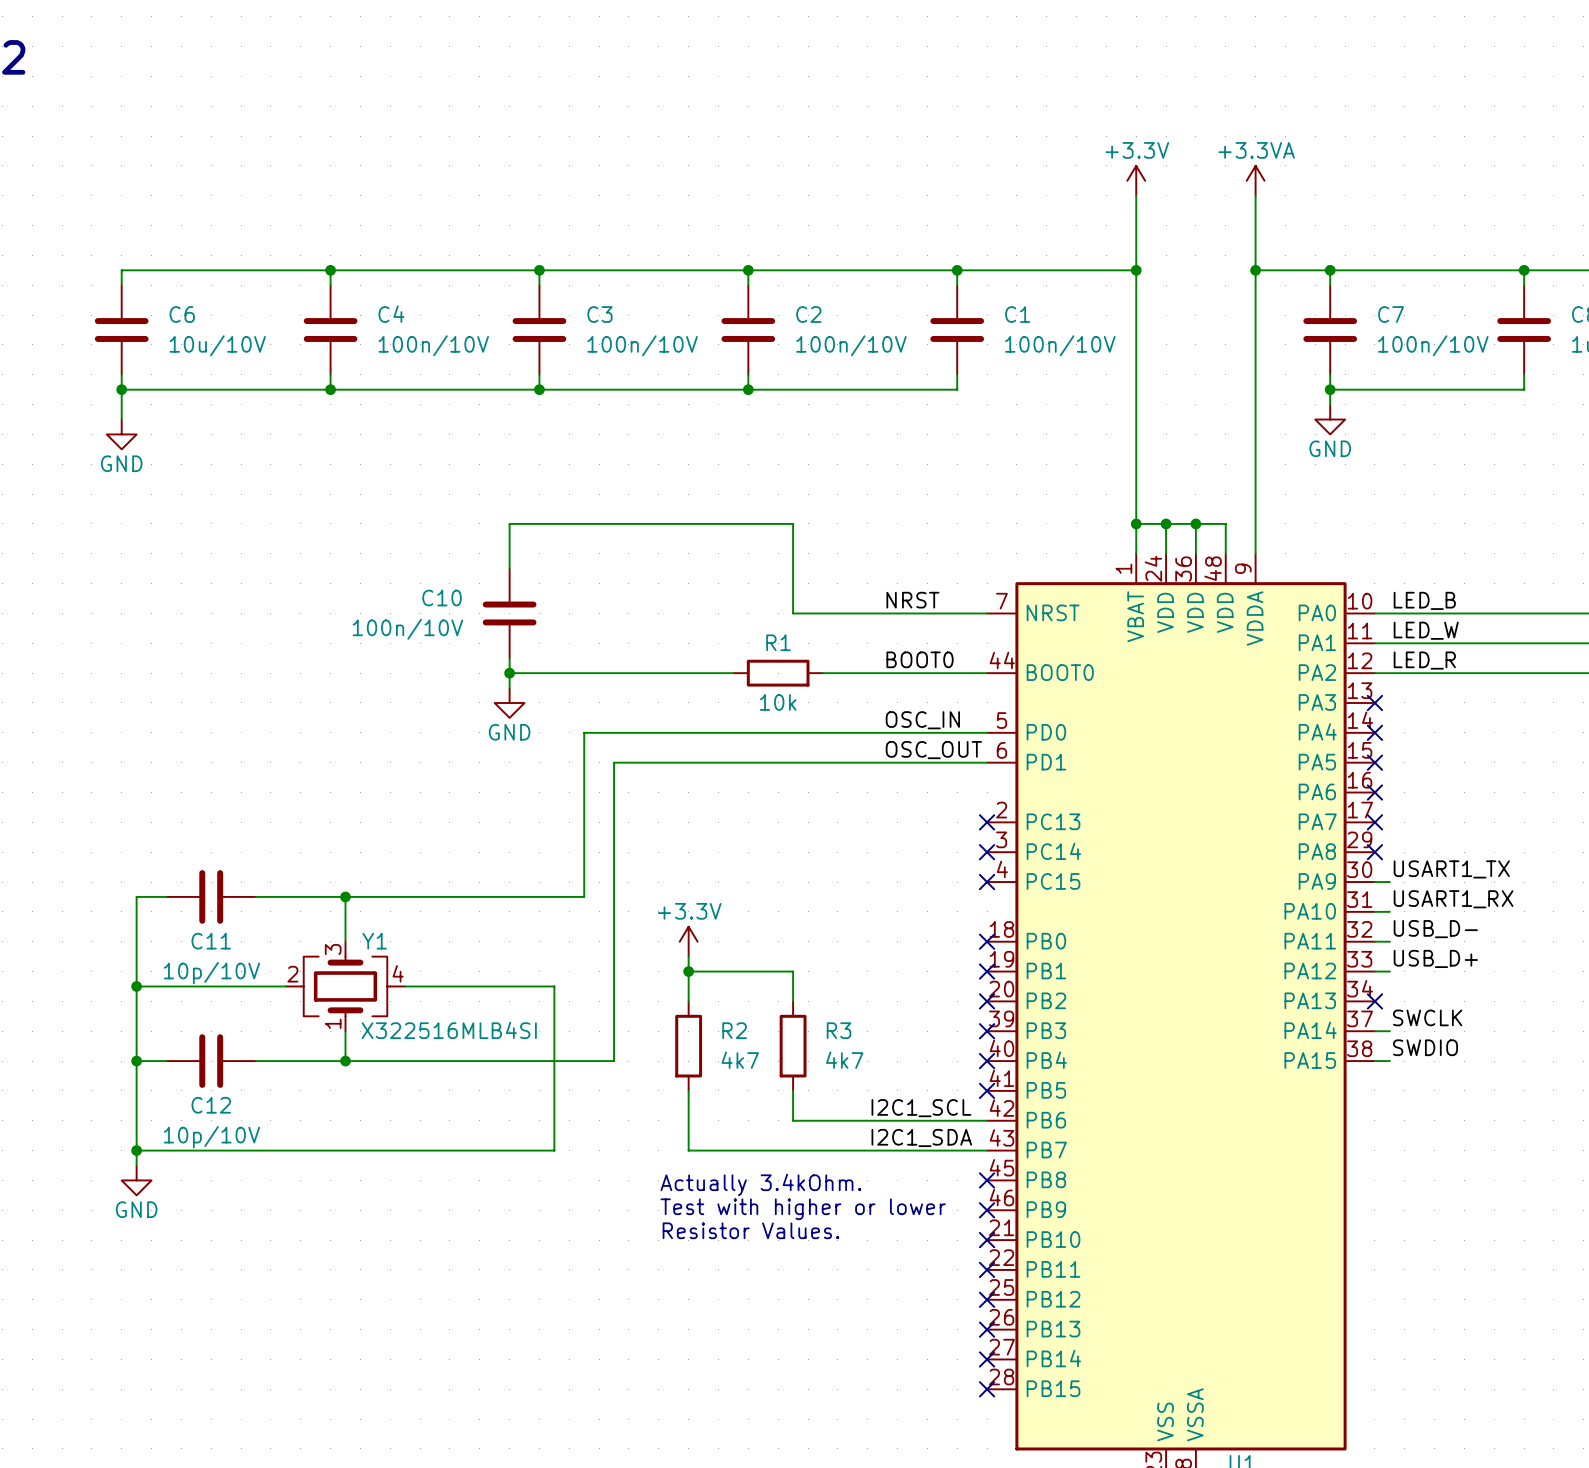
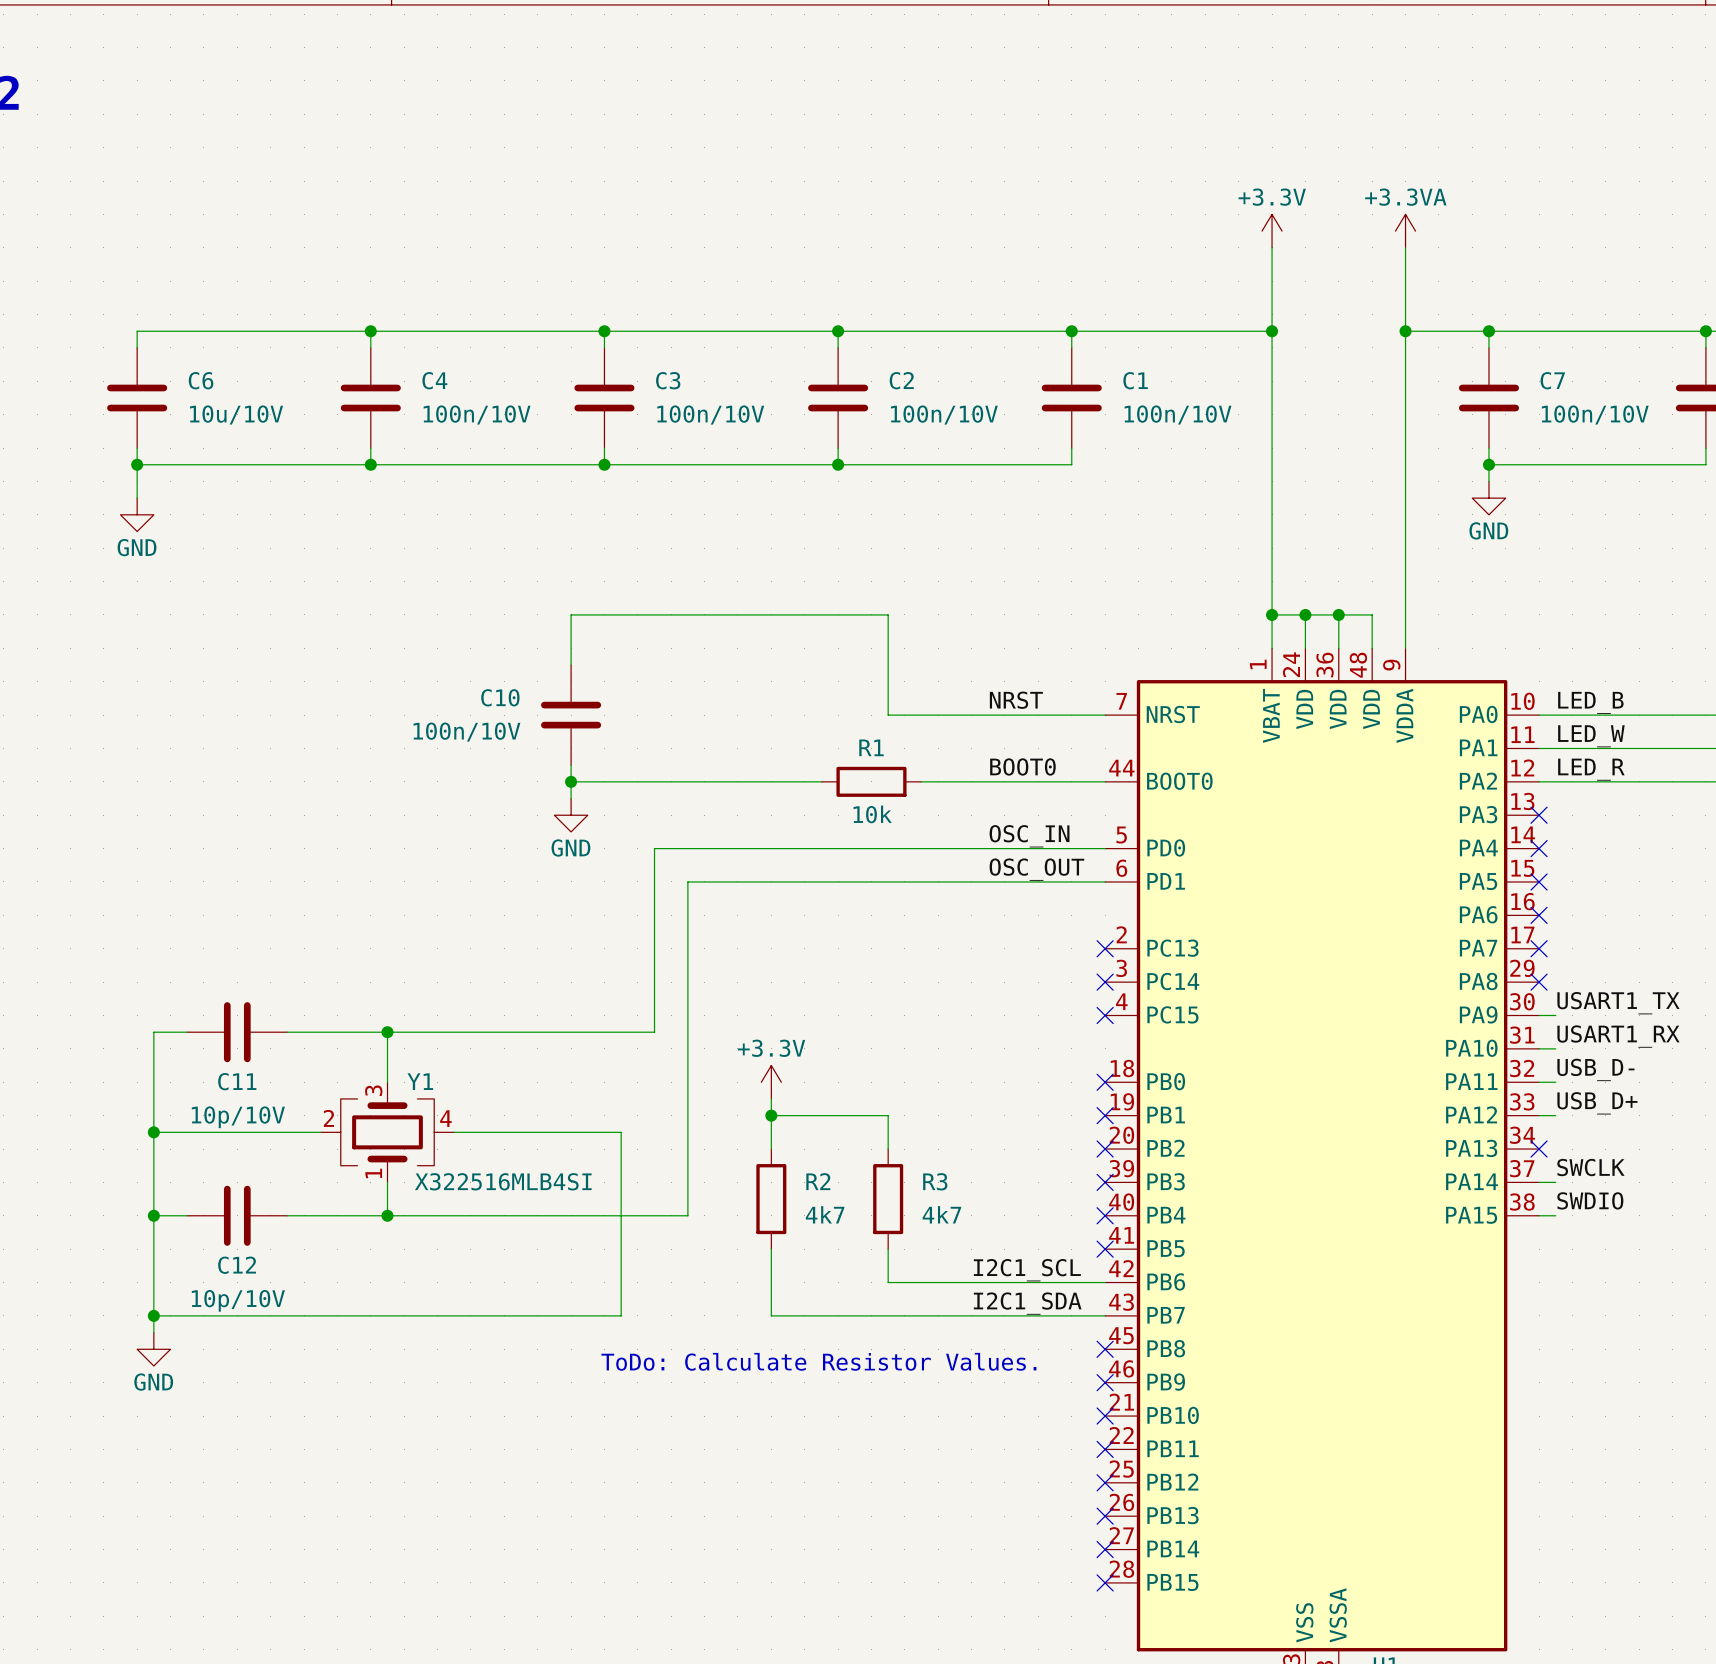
text: Actually 3.4kOhm. (760, 1184) -> none
text: none -> ToDo: Calculate Resistor Values. (818, 1361)
text: Test with higher or lower (803, 1209) -> none
text: Resistor Values. (750, 1230) -> none

